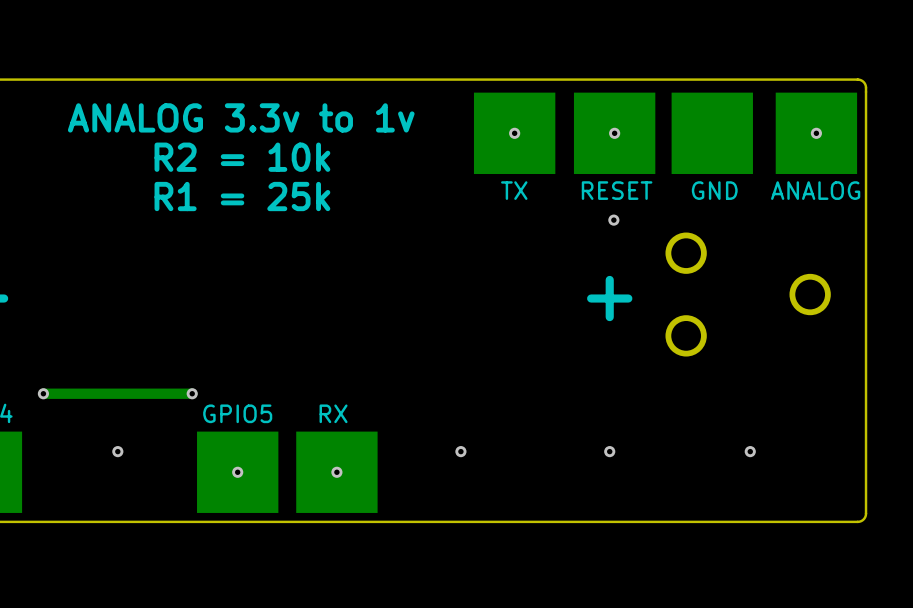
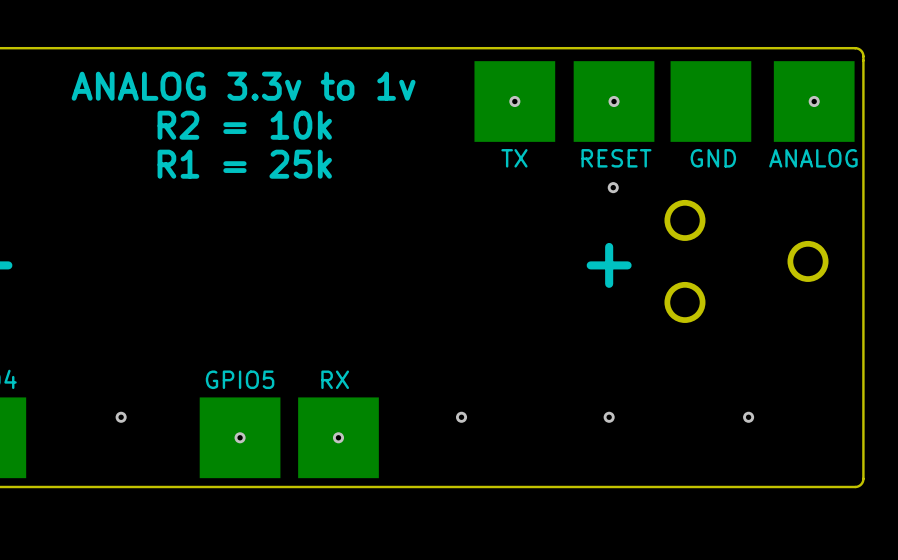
via: (43, 393) -> none
track: (192, 393) (43, 393) -> none
via: (192, 393) -> none

